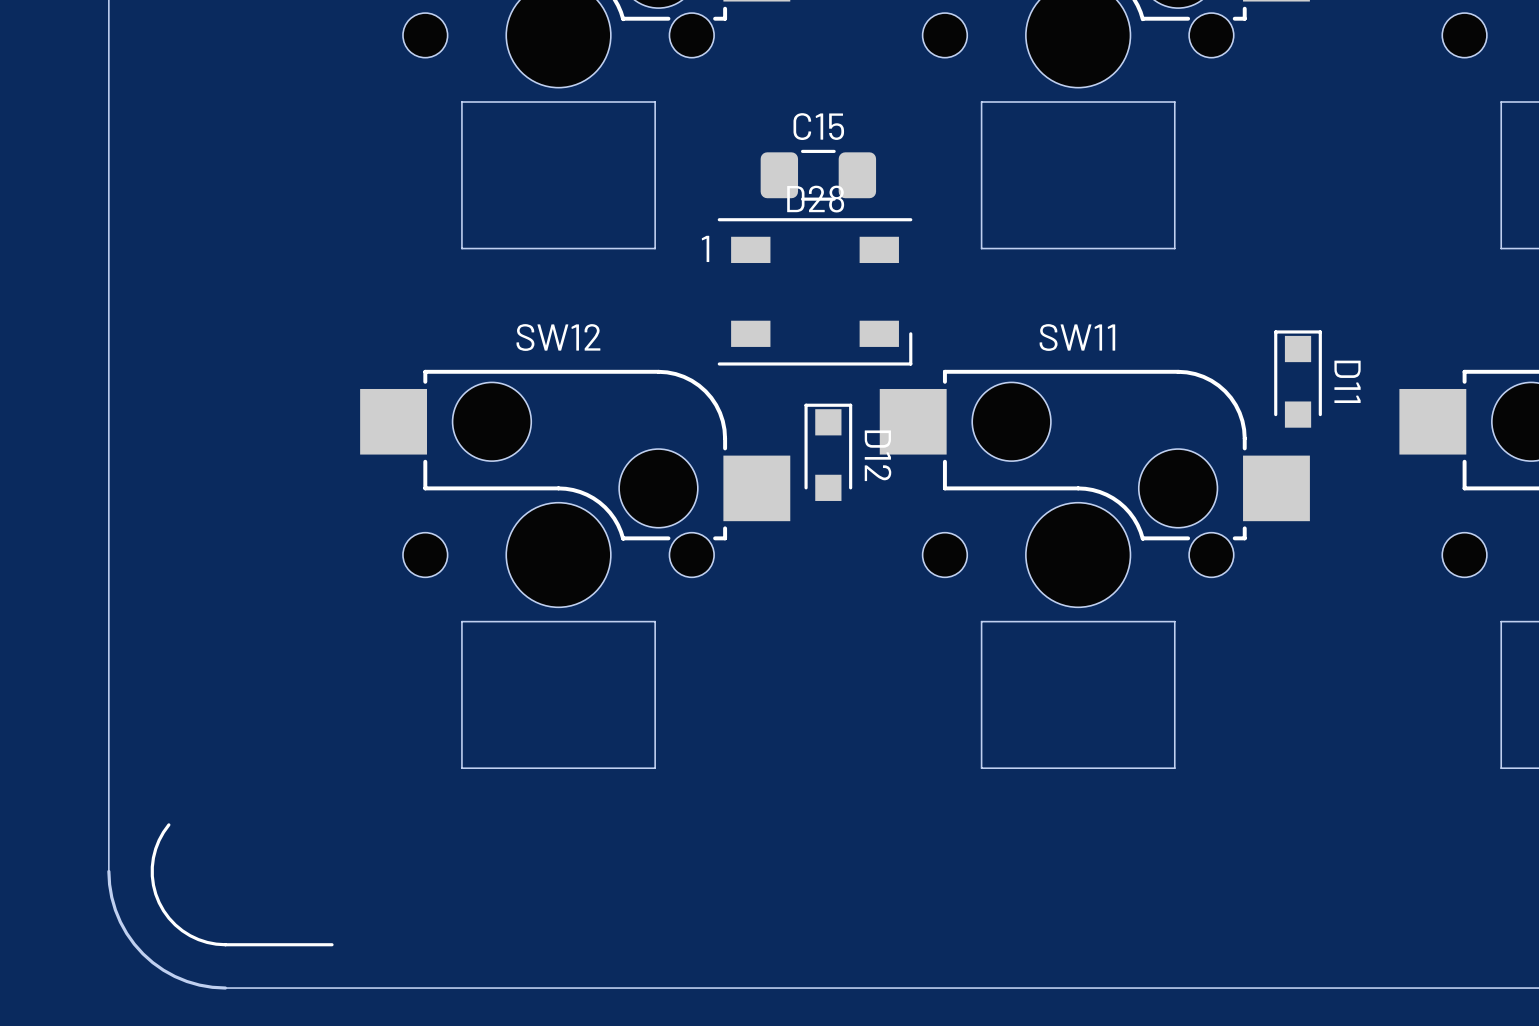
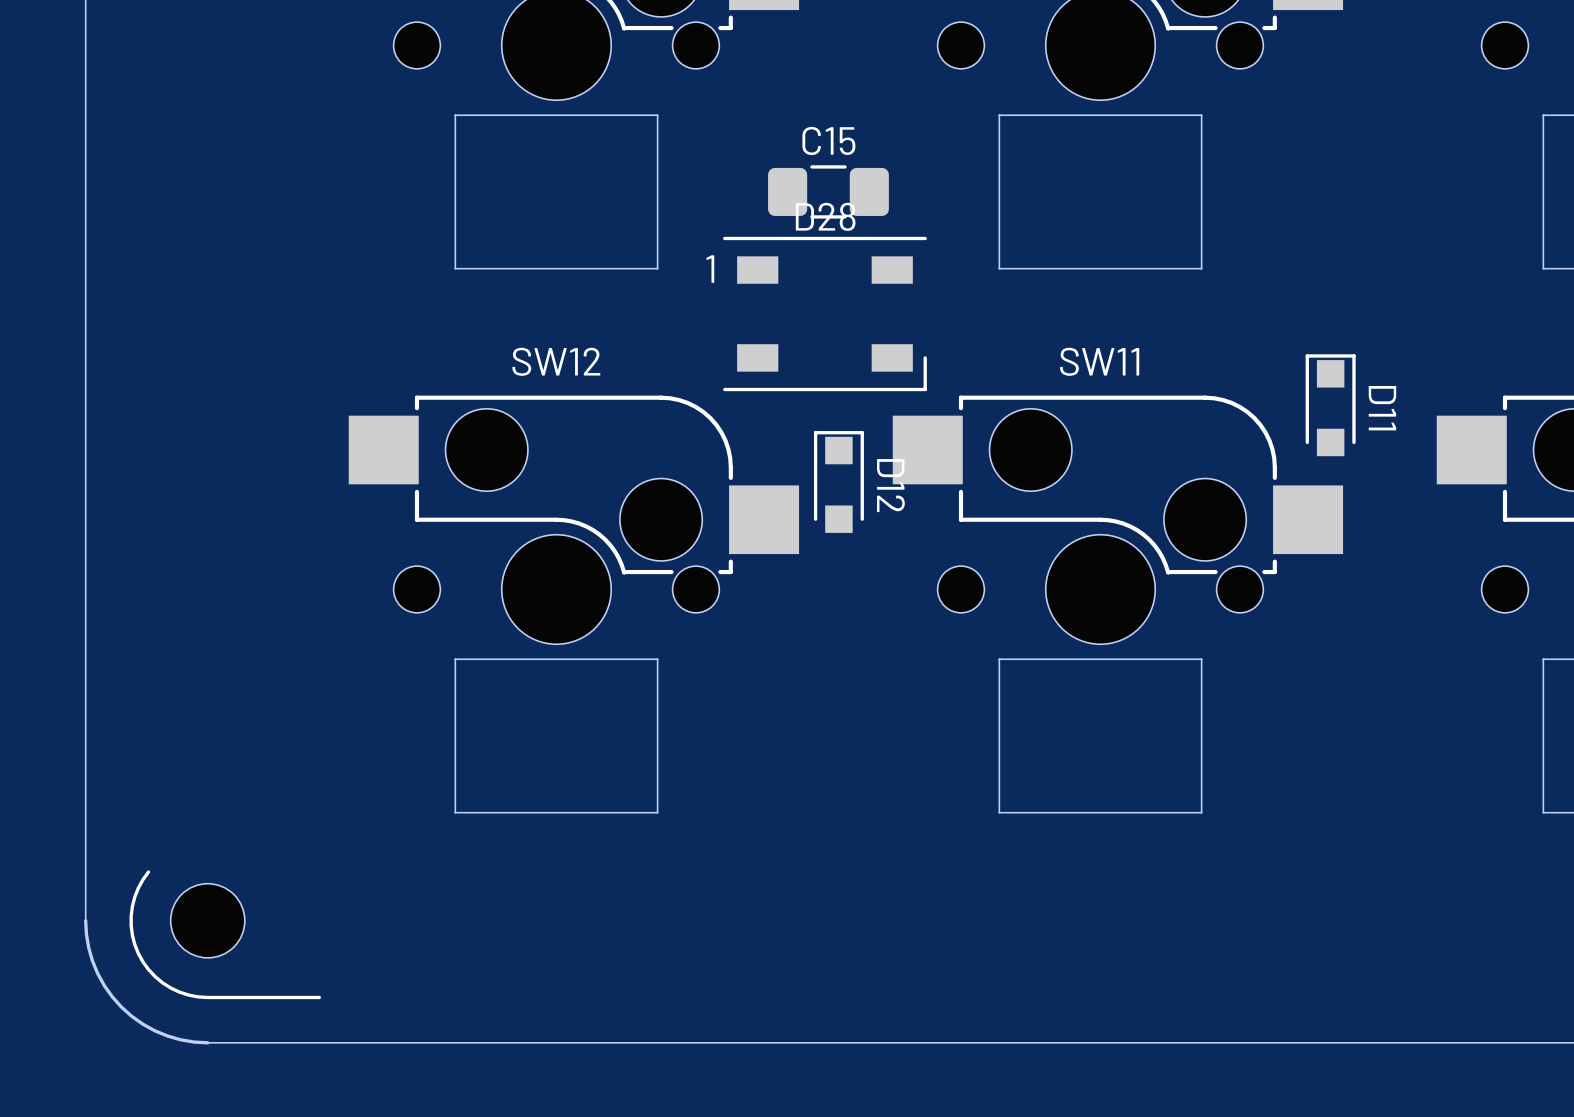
part: none -> (207, 920)

